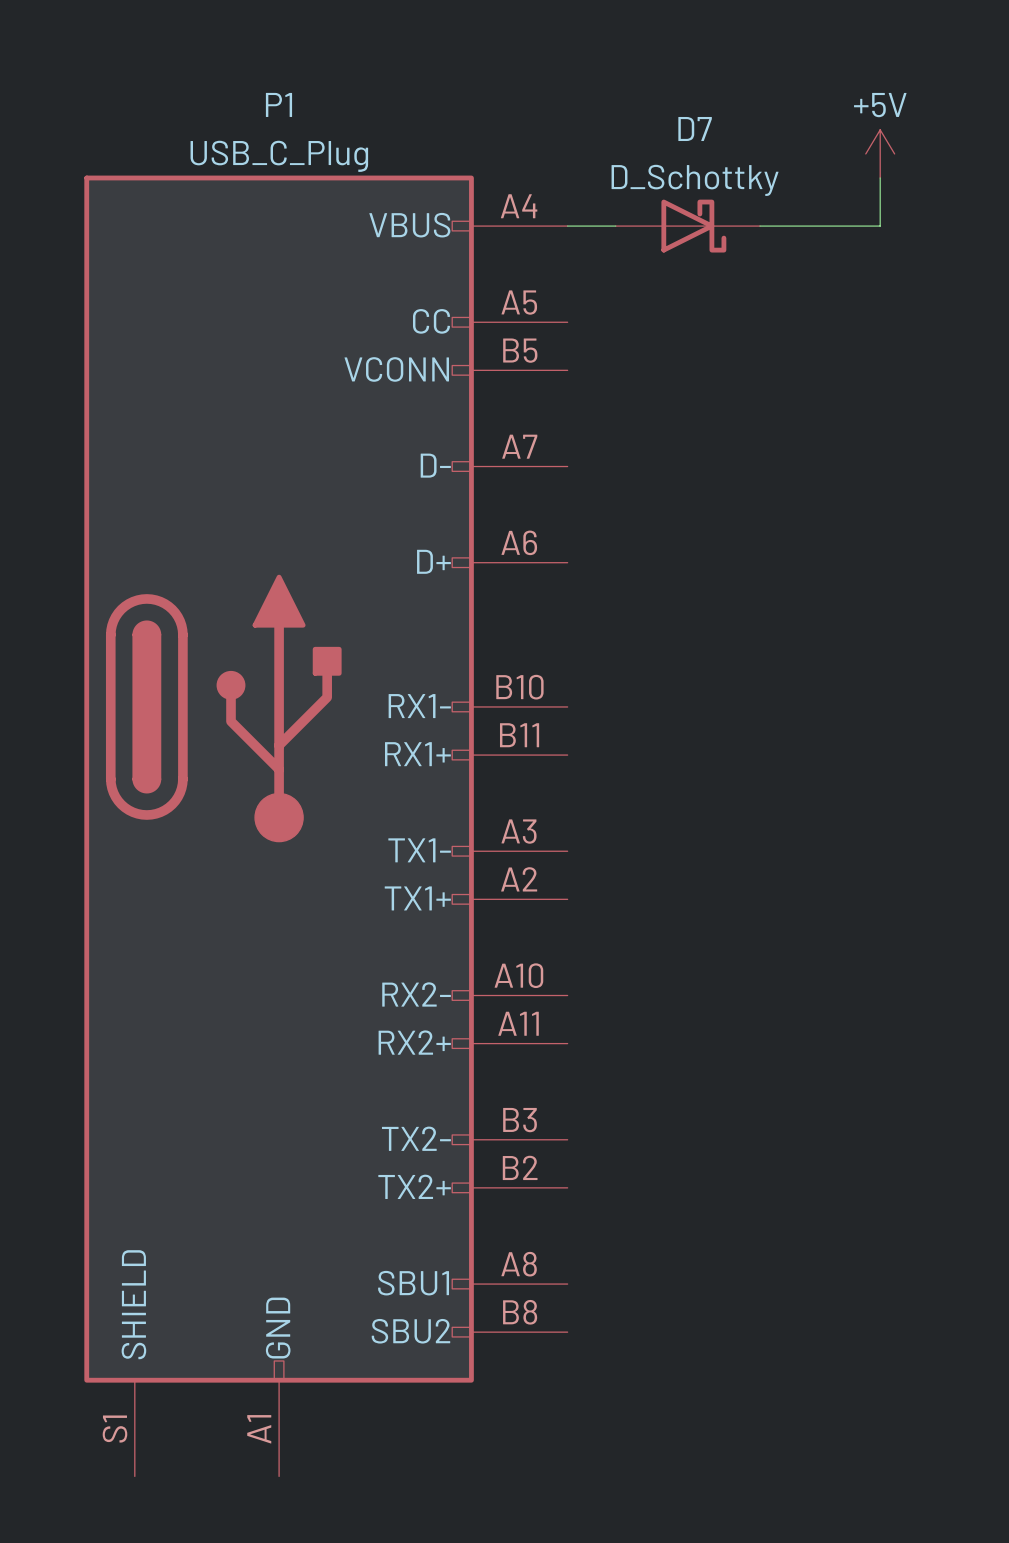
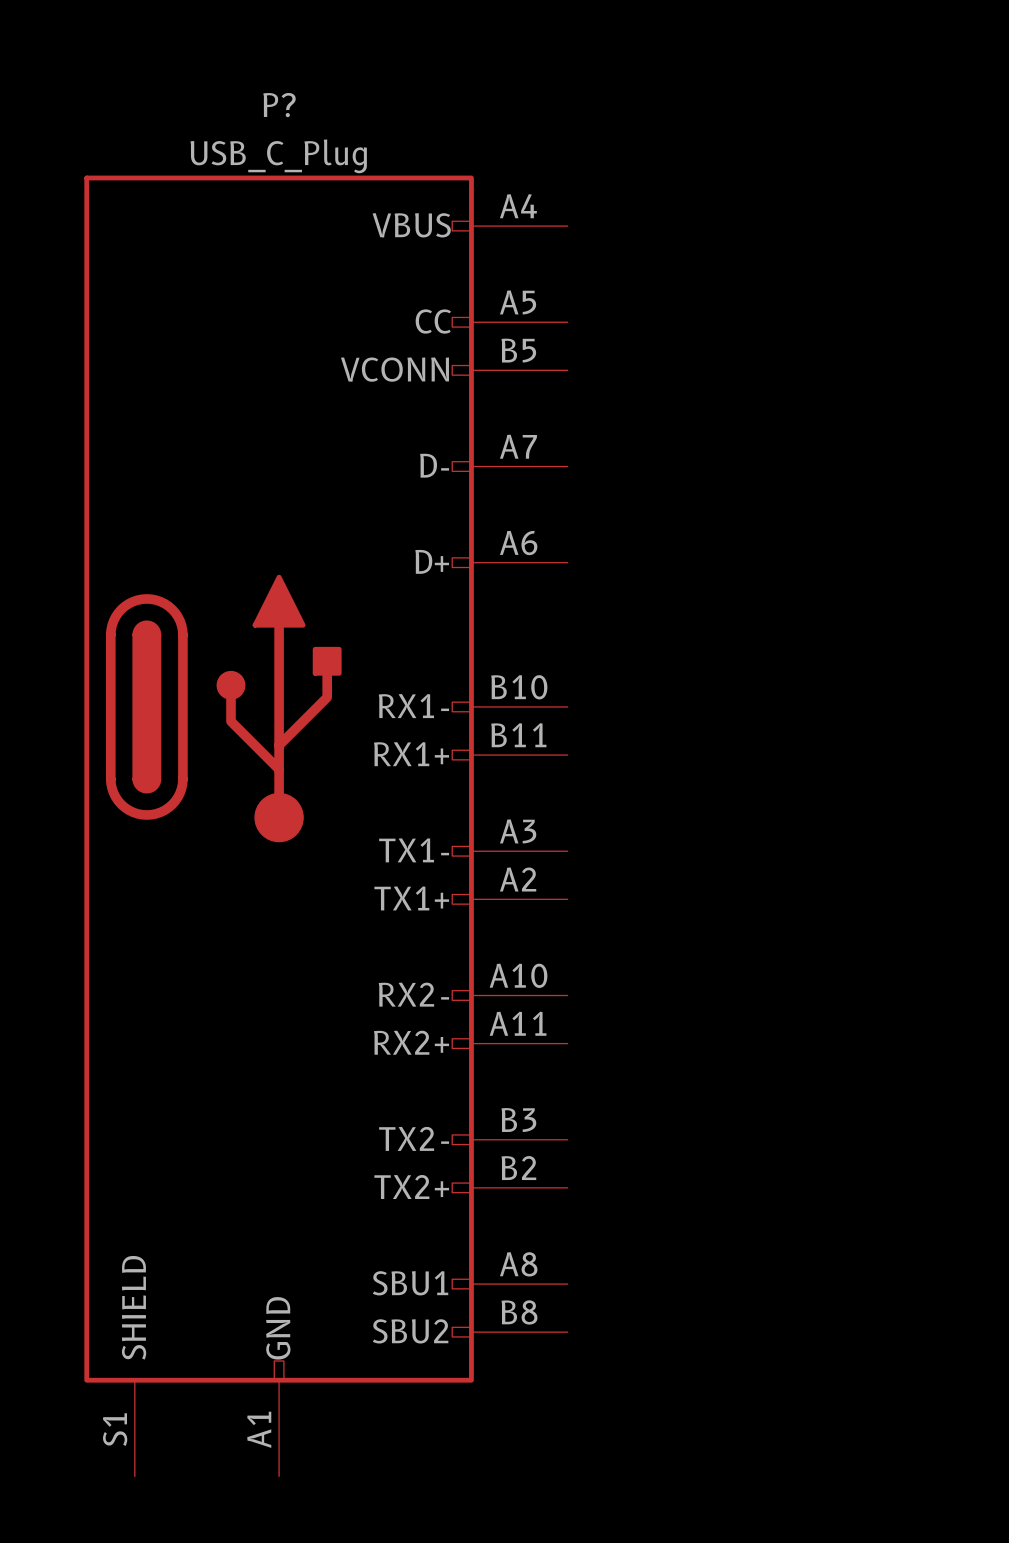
P1 name: P1 (278, 104) -> P? (279, 105)
power symbol: +5V (880, 153) -> none
wire: (880, 177) (880, 226) (759, 226) -> none
wire: (567, 226) (615, 226) -> none
D7: D_Schottky (687, 226) -> none

